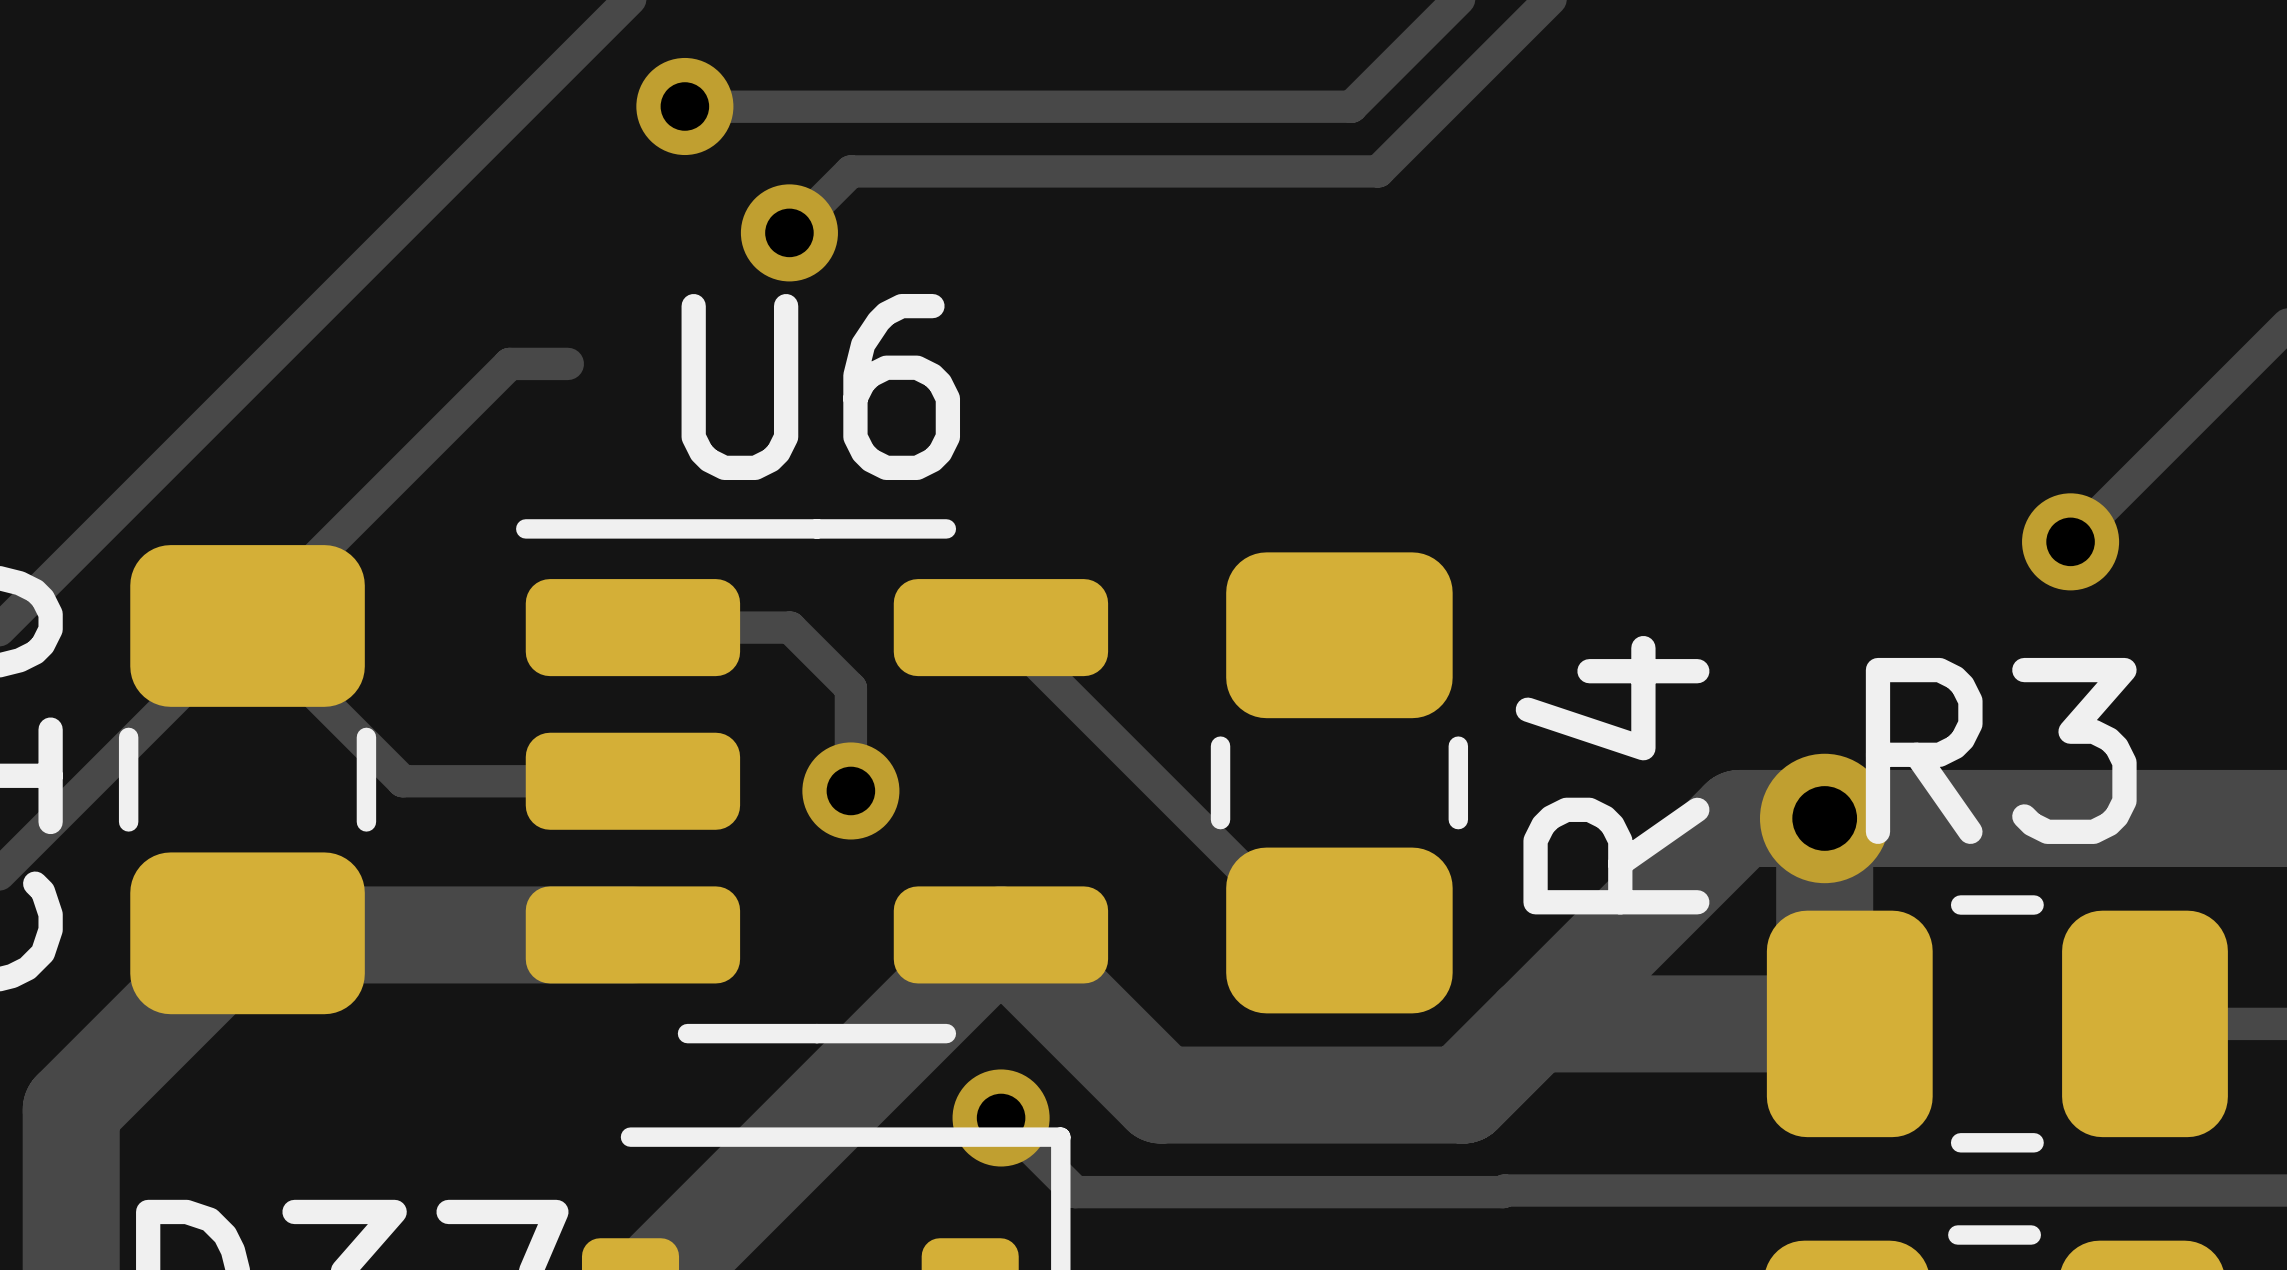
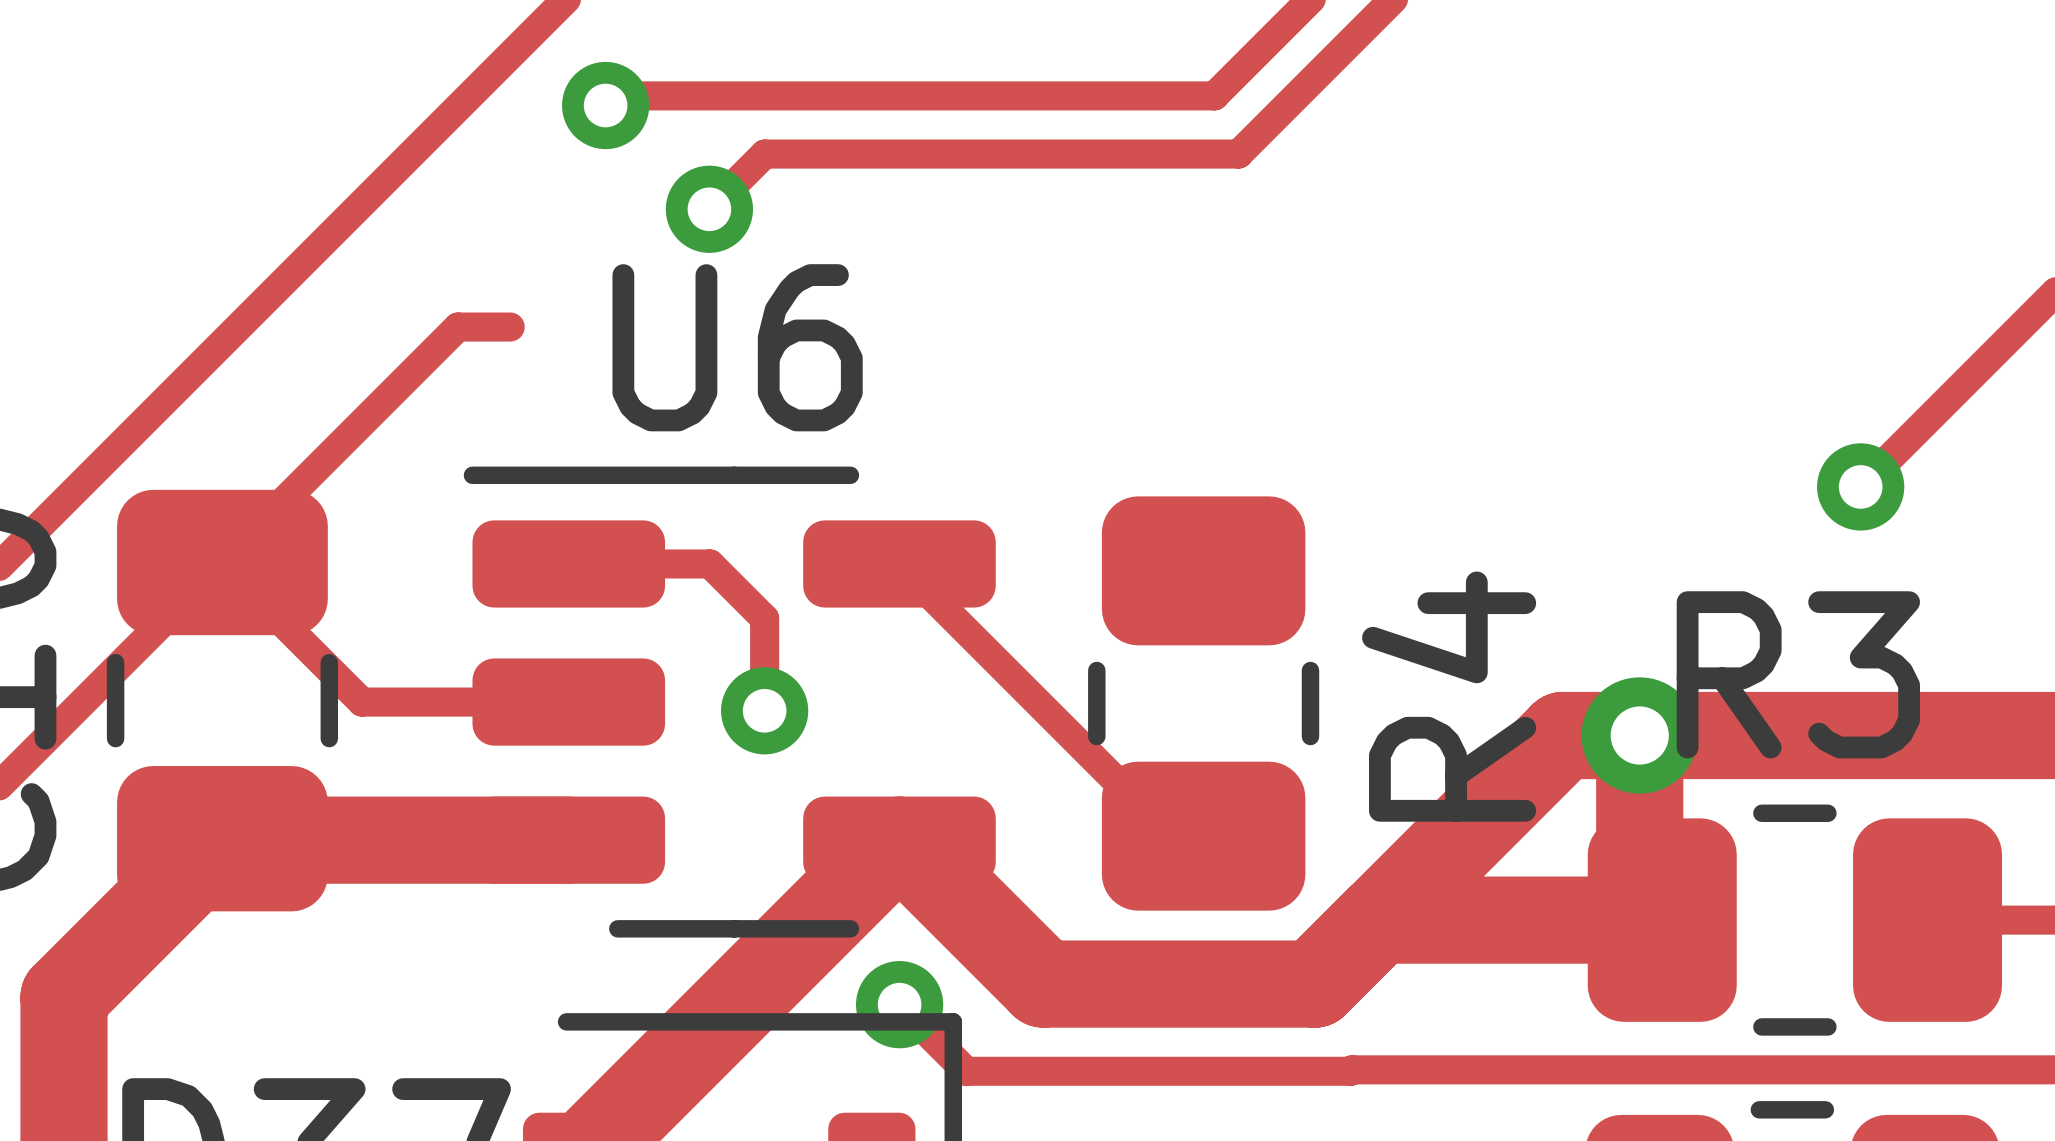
via position: (684, 106) -> (605, 105)

